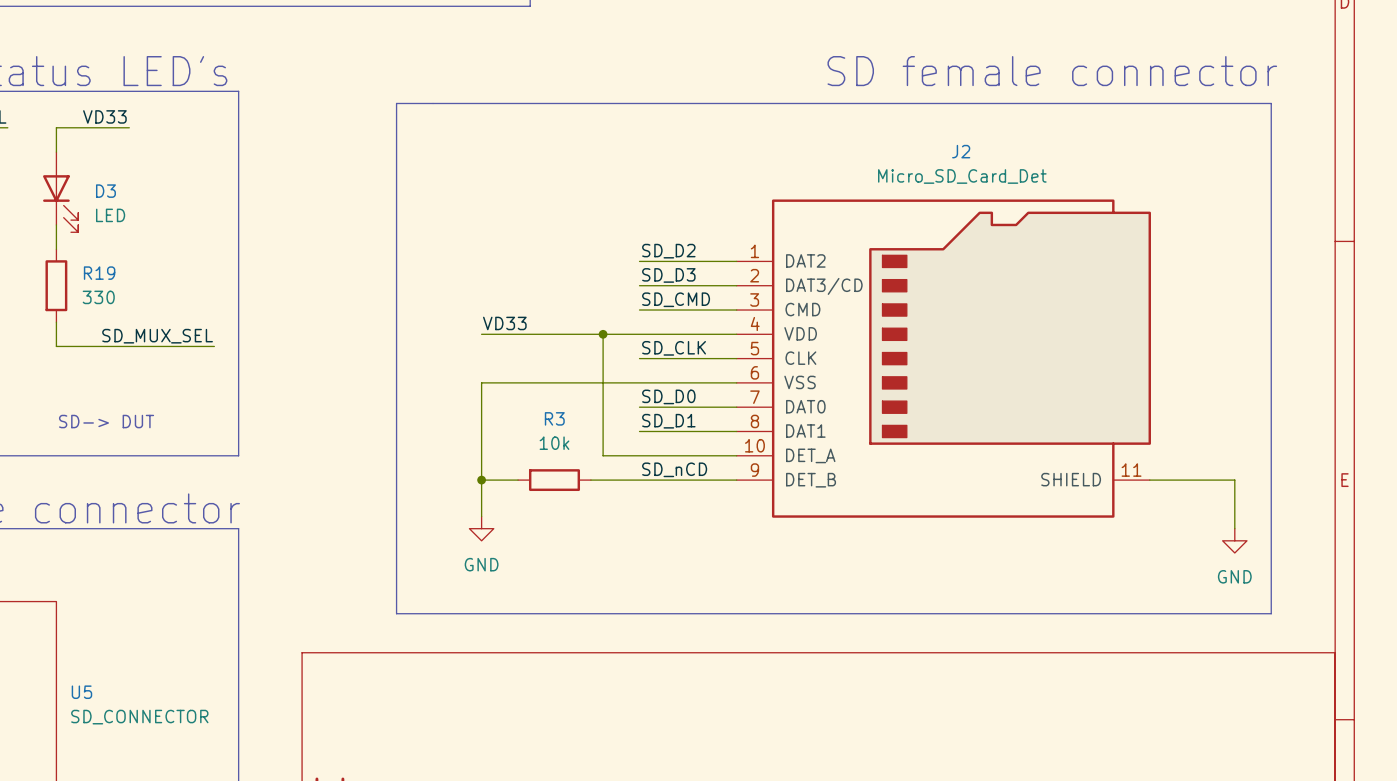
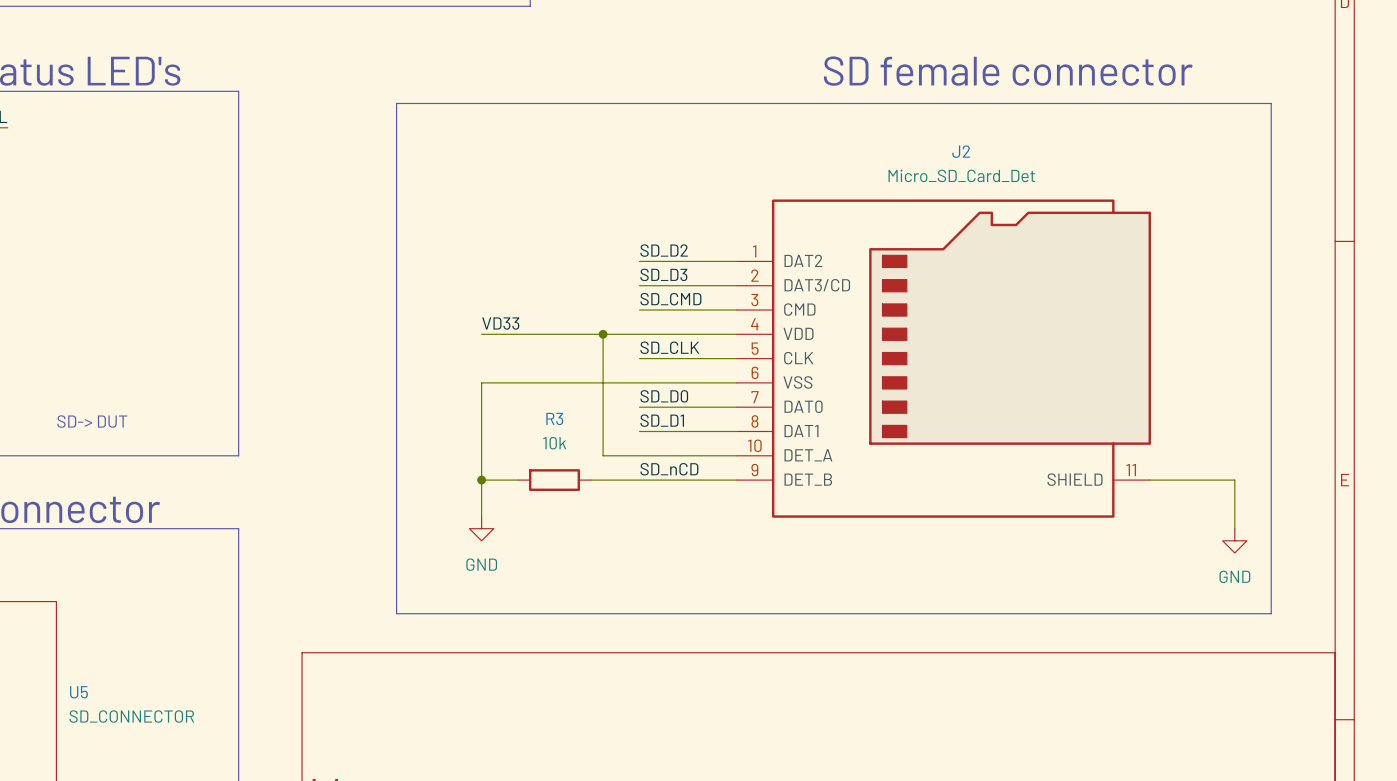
label: VD33 (104, 116) -> none
wire: (129, 127) (56, 127) (56, 152) -> none
D3: LED (60, 192) -> none
wire: (56, 224) (56, 249) -> none
R19: 330 (56, 285) -> none
wire: (56, 322) (56, 346) (214, 346) -> none
label: SD_MUX_SEL (157, 336) -> none

